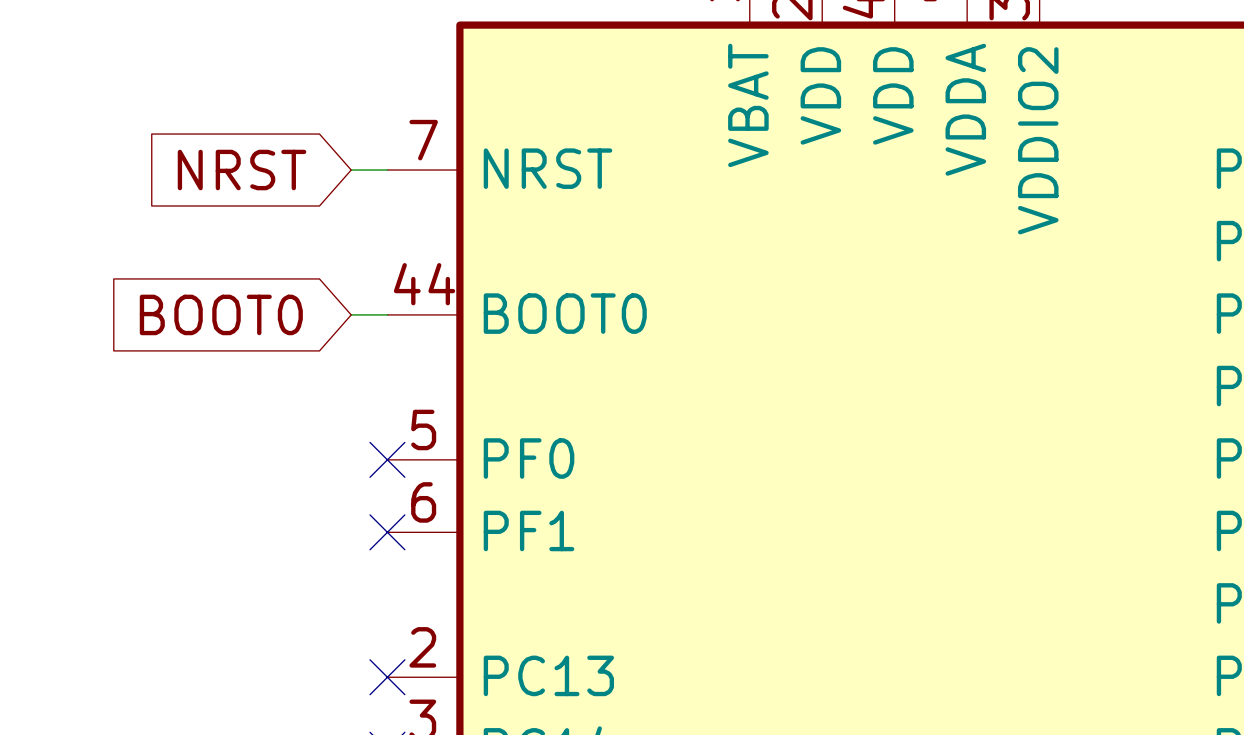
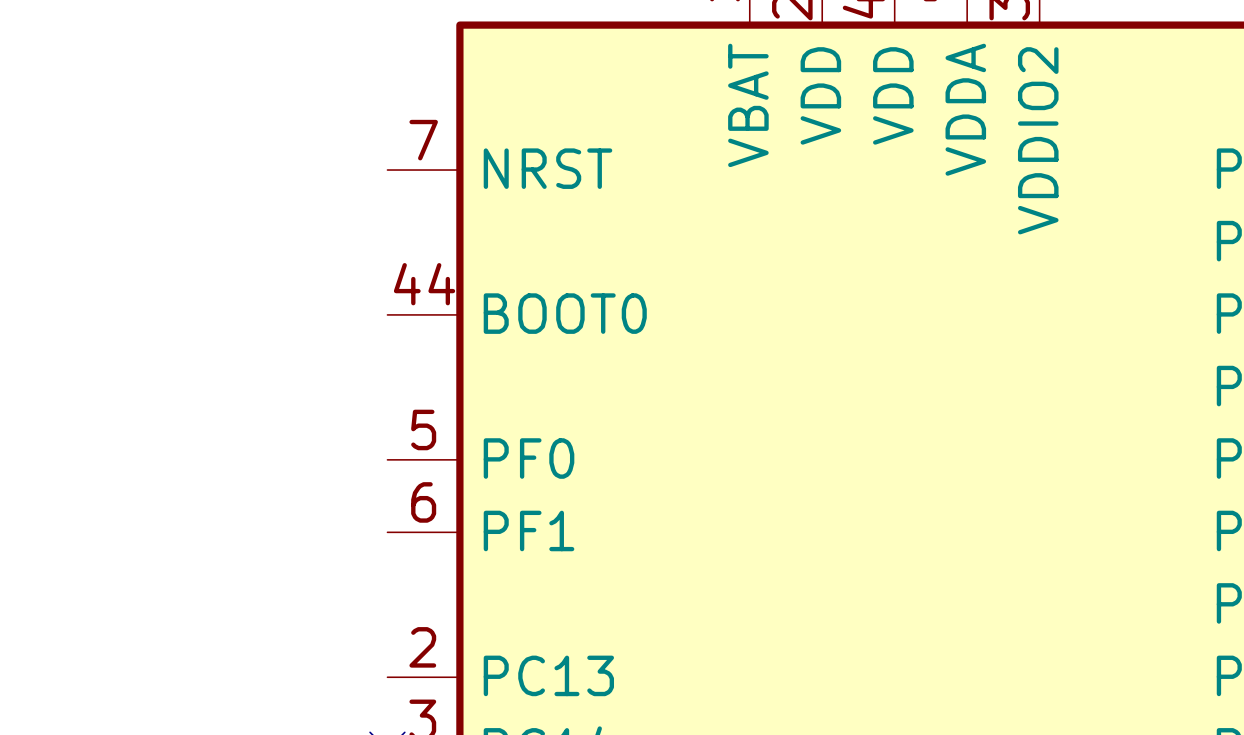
global label: NRST (242, 170) -> none
wire: (351, 170) (387, 170) -> none
global label: BOOT0 (221, 314) -> none
wire: (351, 314) (387, 314) -> none
no-connect mark: (387, 459) -> none
no-connect mark: (387, 532) -> none
no-connect mark: (387, 677) -> none

